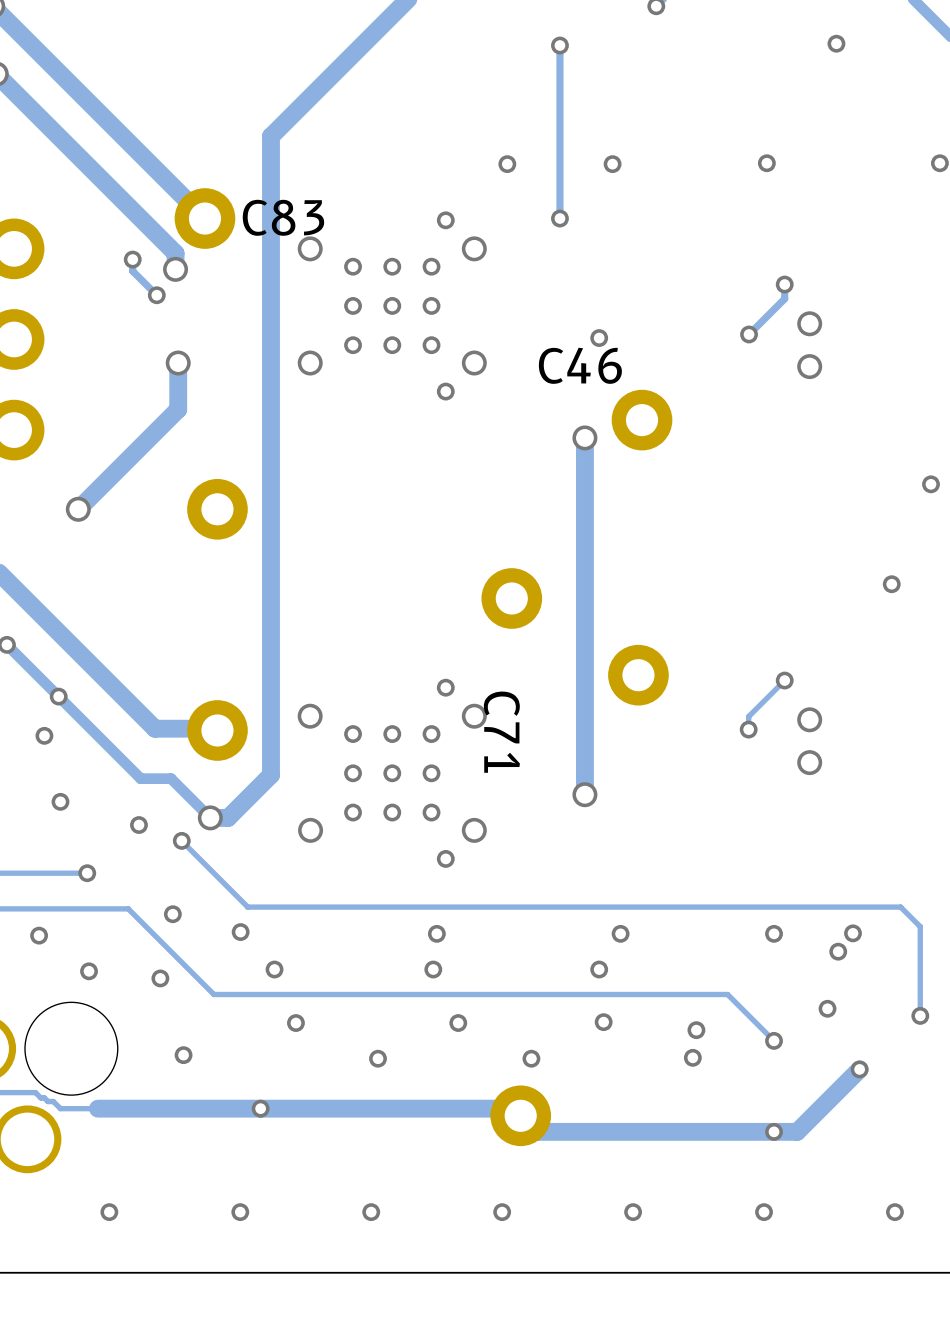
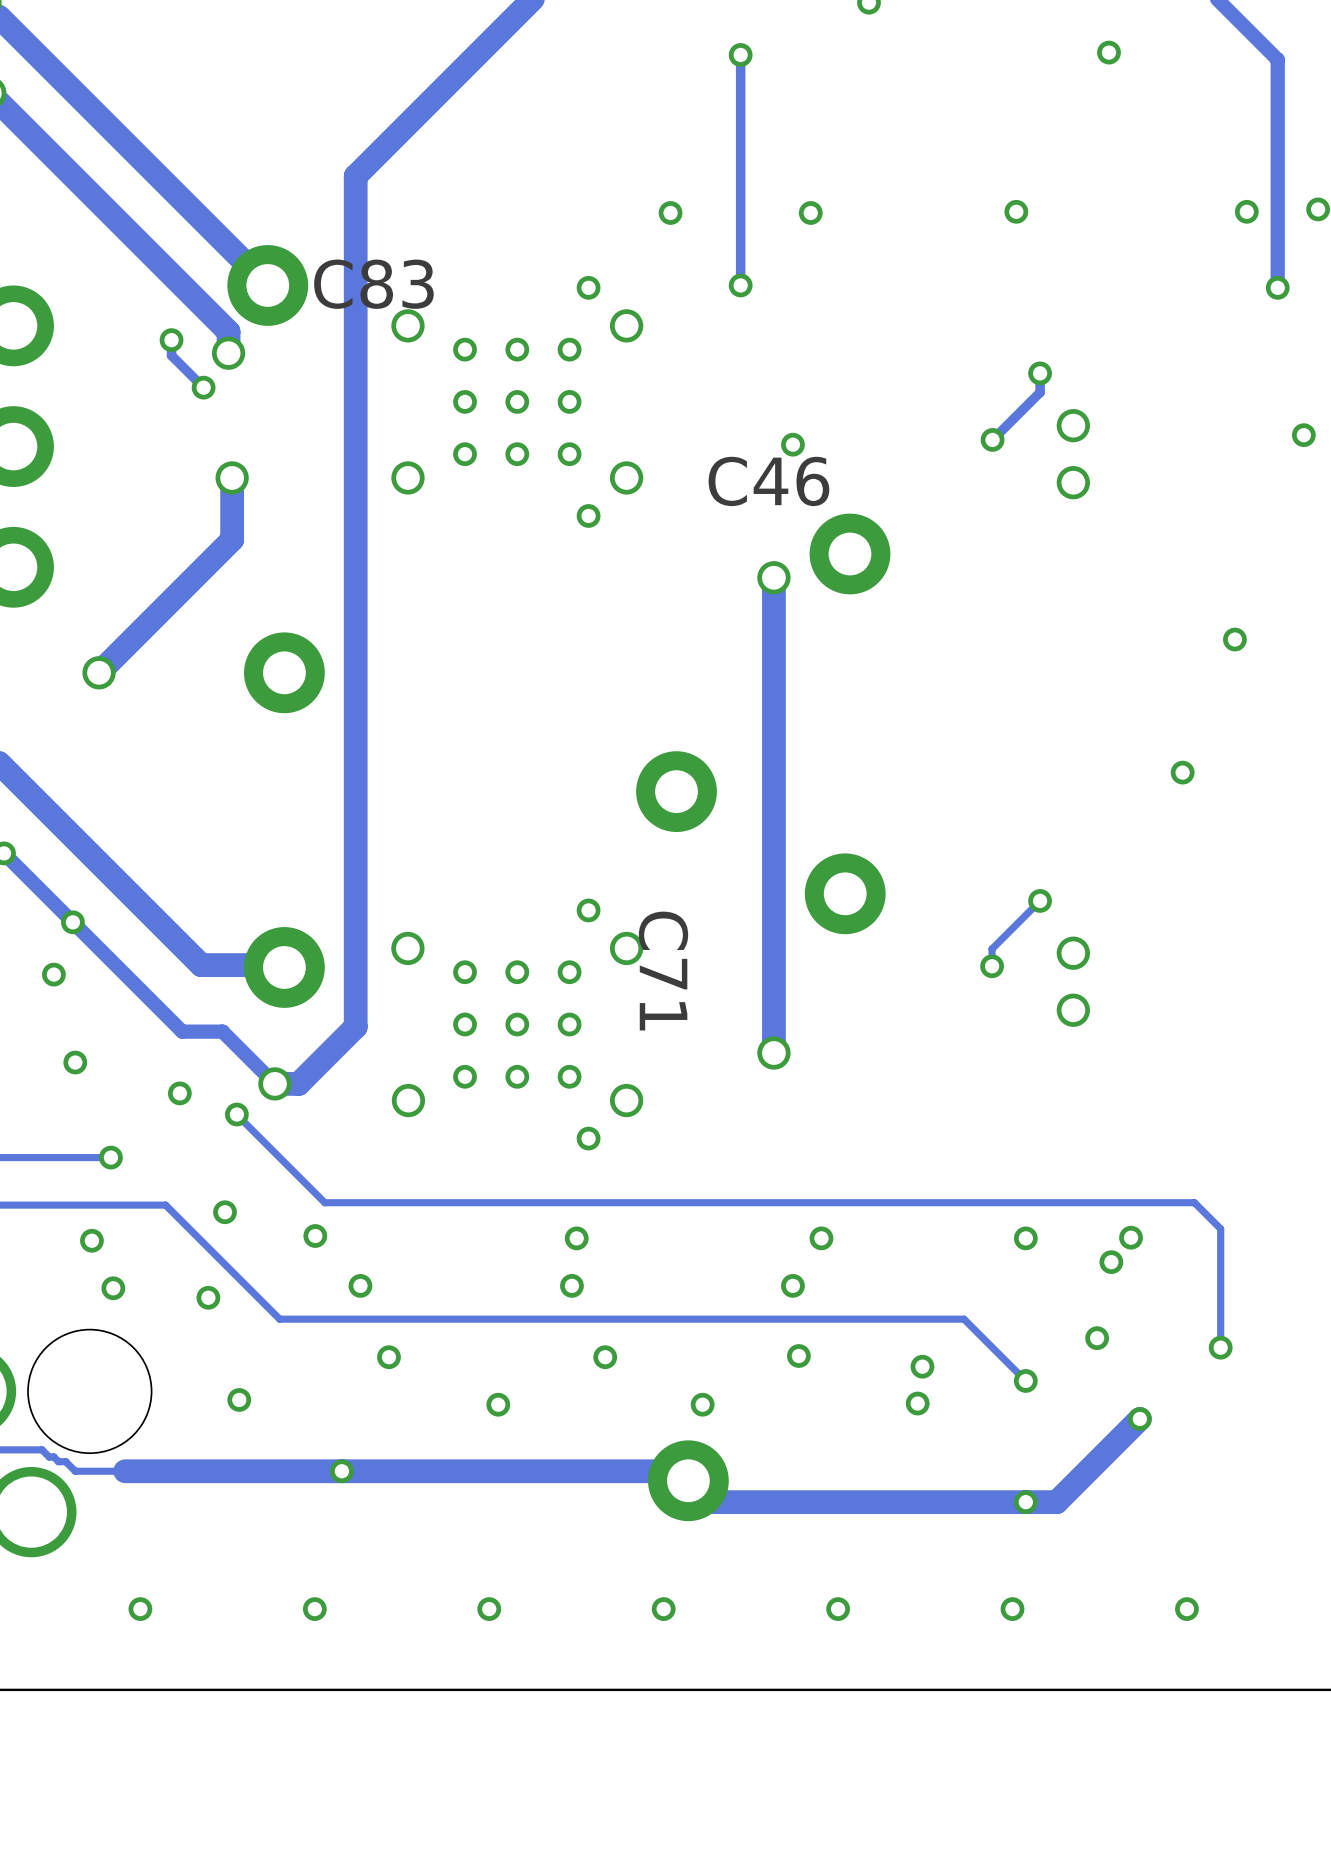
via position: (39, 935) -> (91, 1240)

